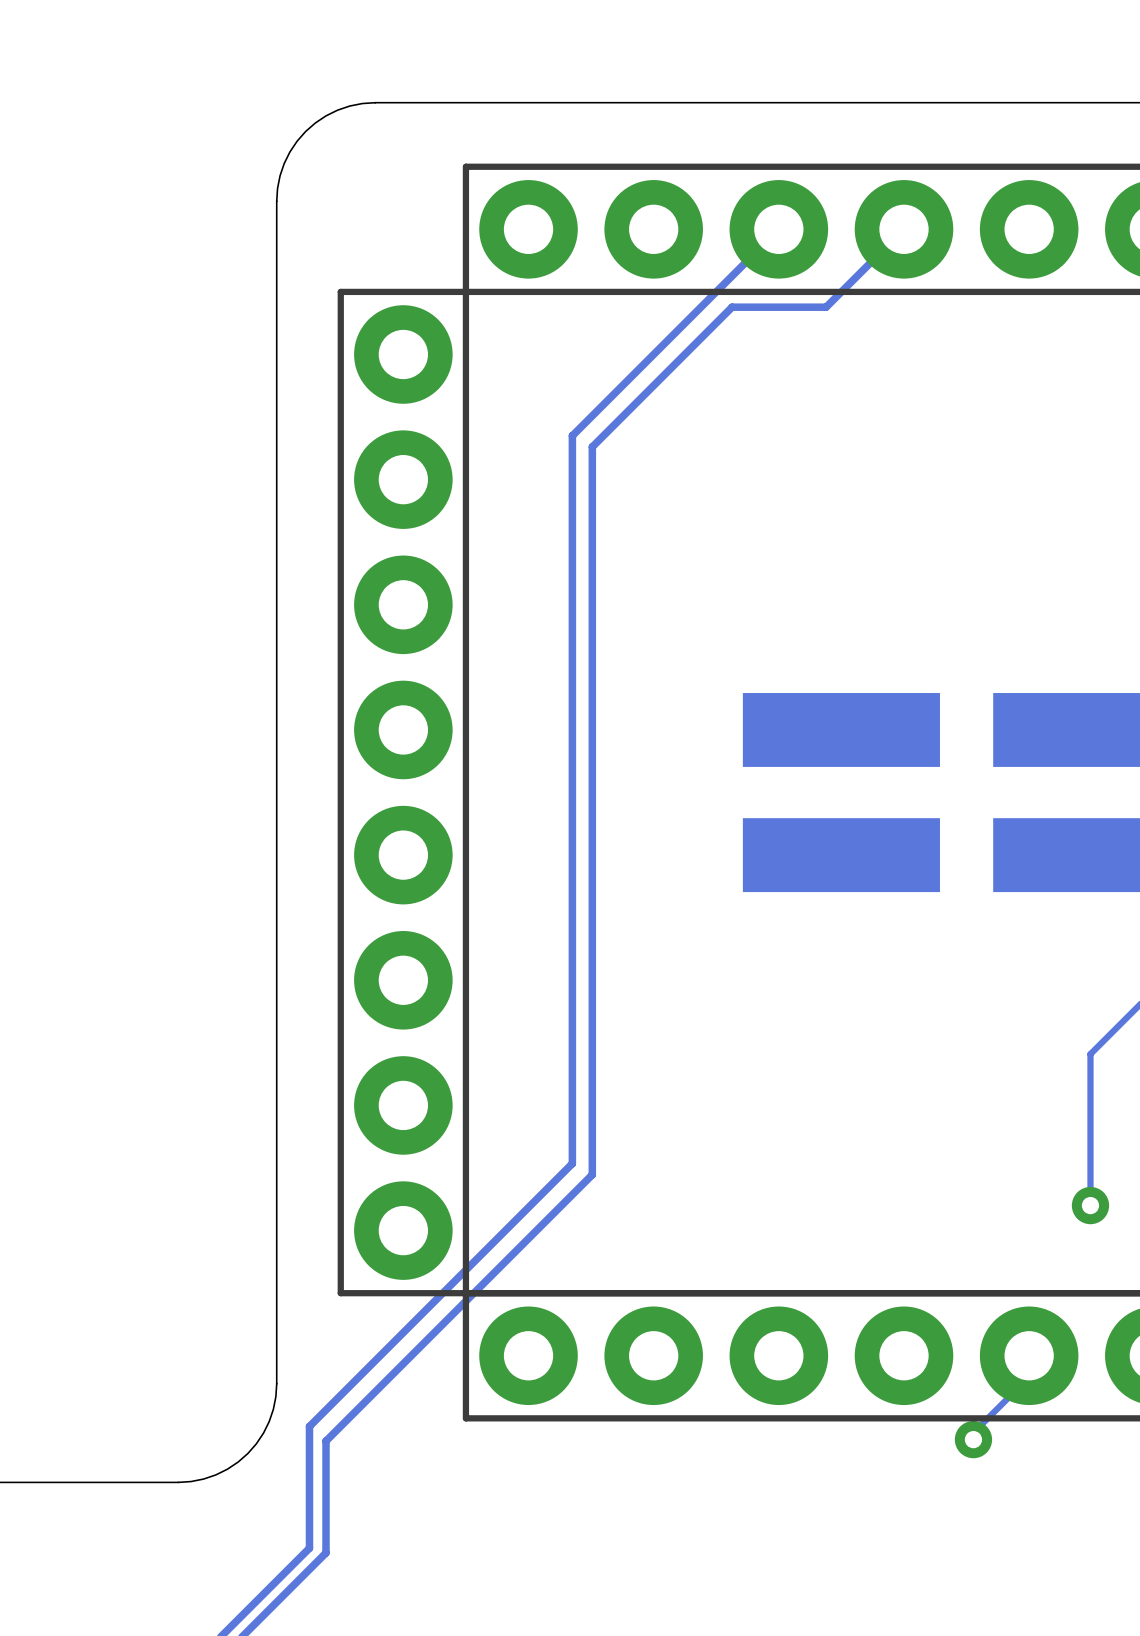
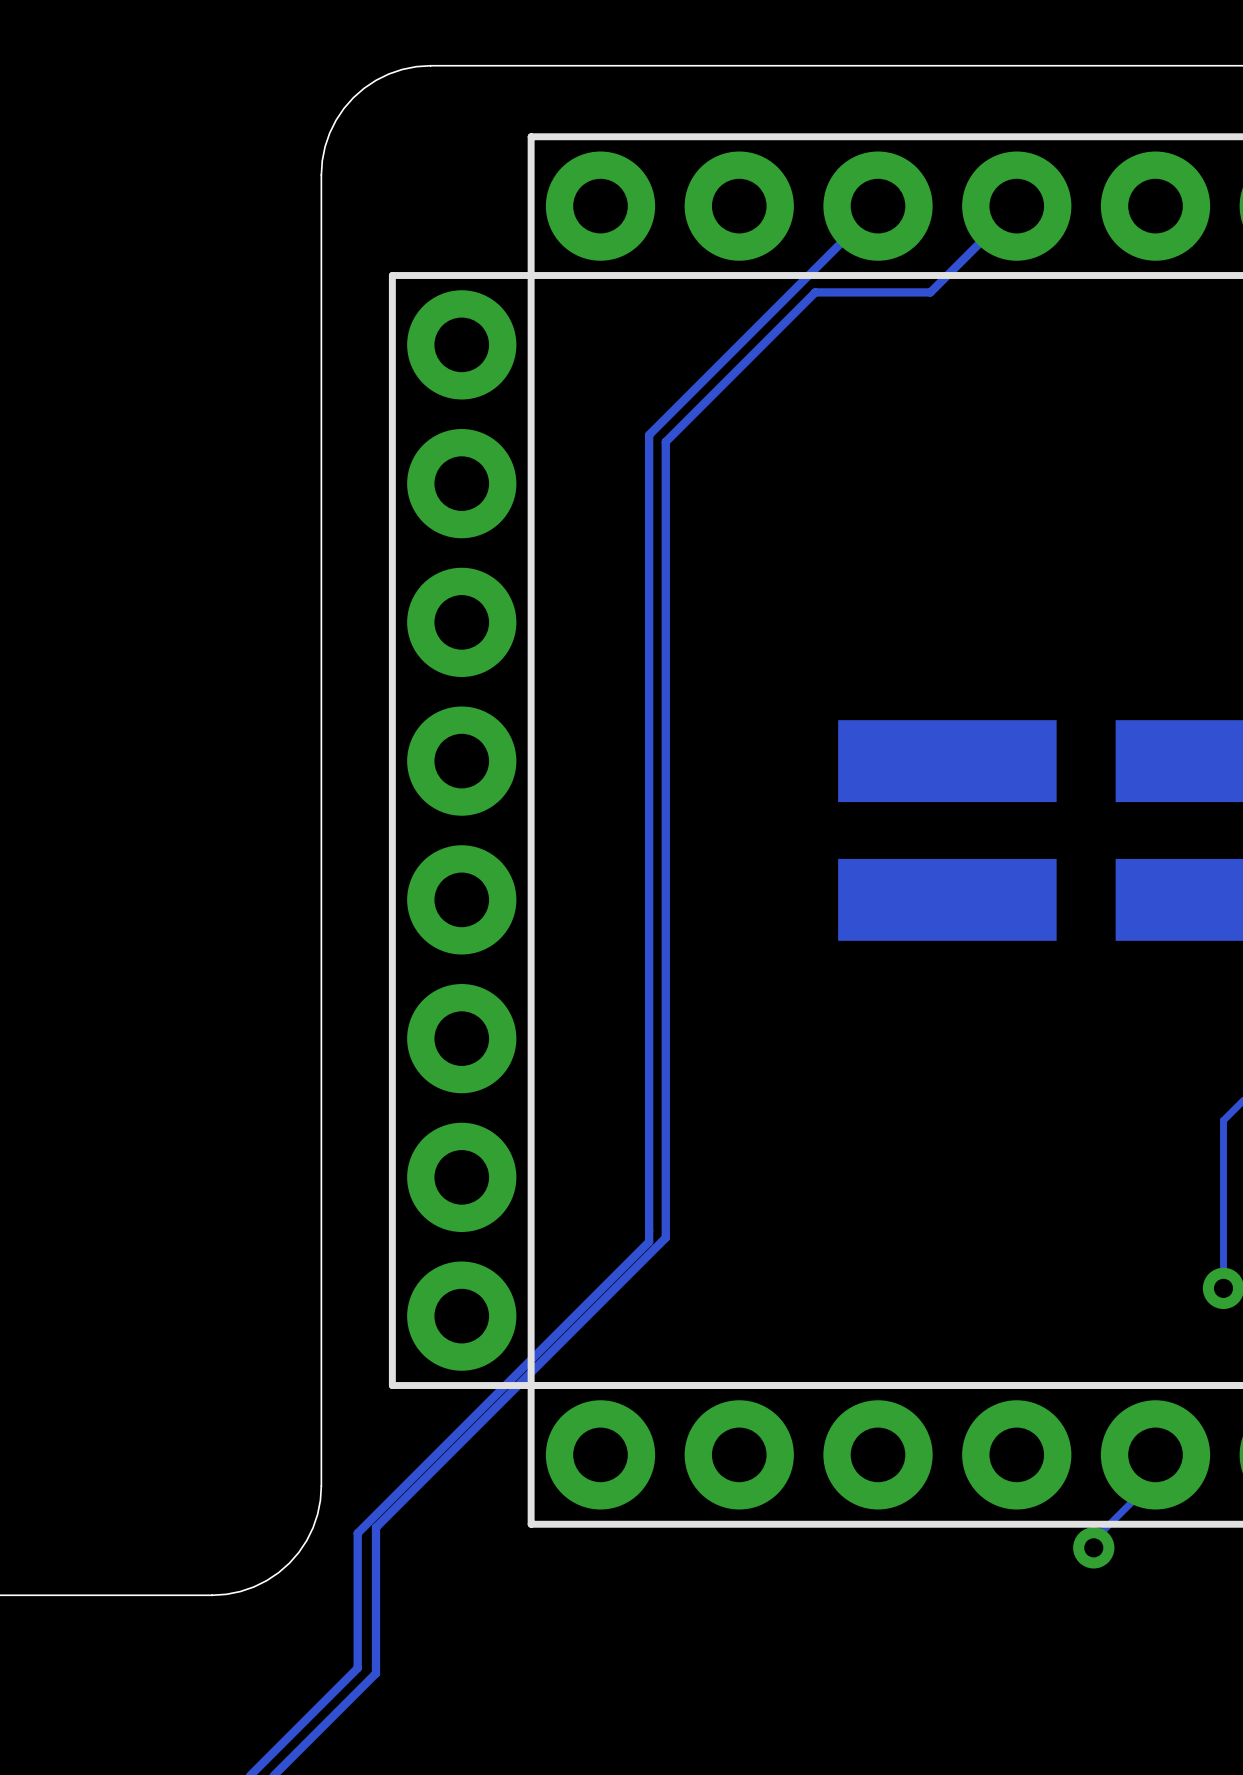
track: (732, 307) (592, 446) (592, 1174) (325, 1441) -> (826, 292) (815, 292) (665, 441) (665, 1237) (375, 1527) (375, 1549)

